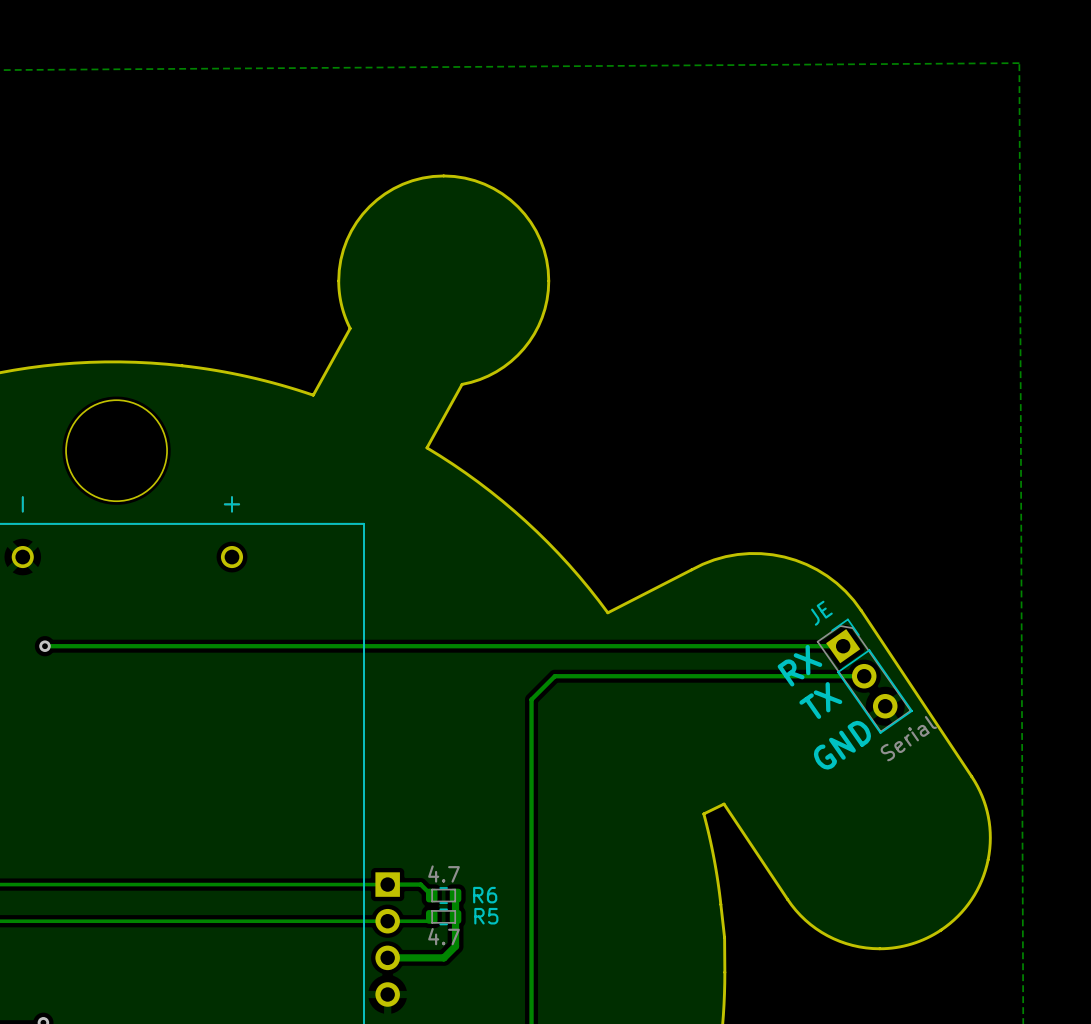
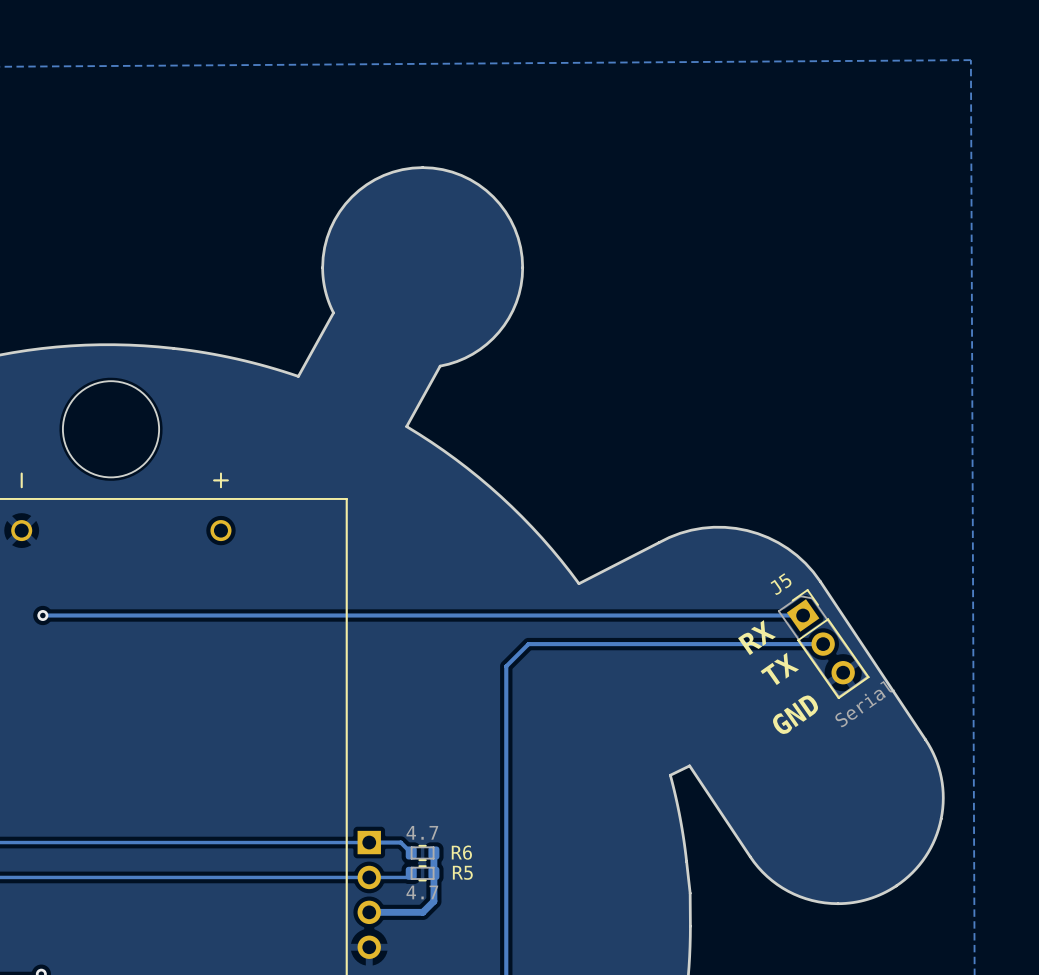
JE name: JE (821, 613) -> J5 (781, 584)

